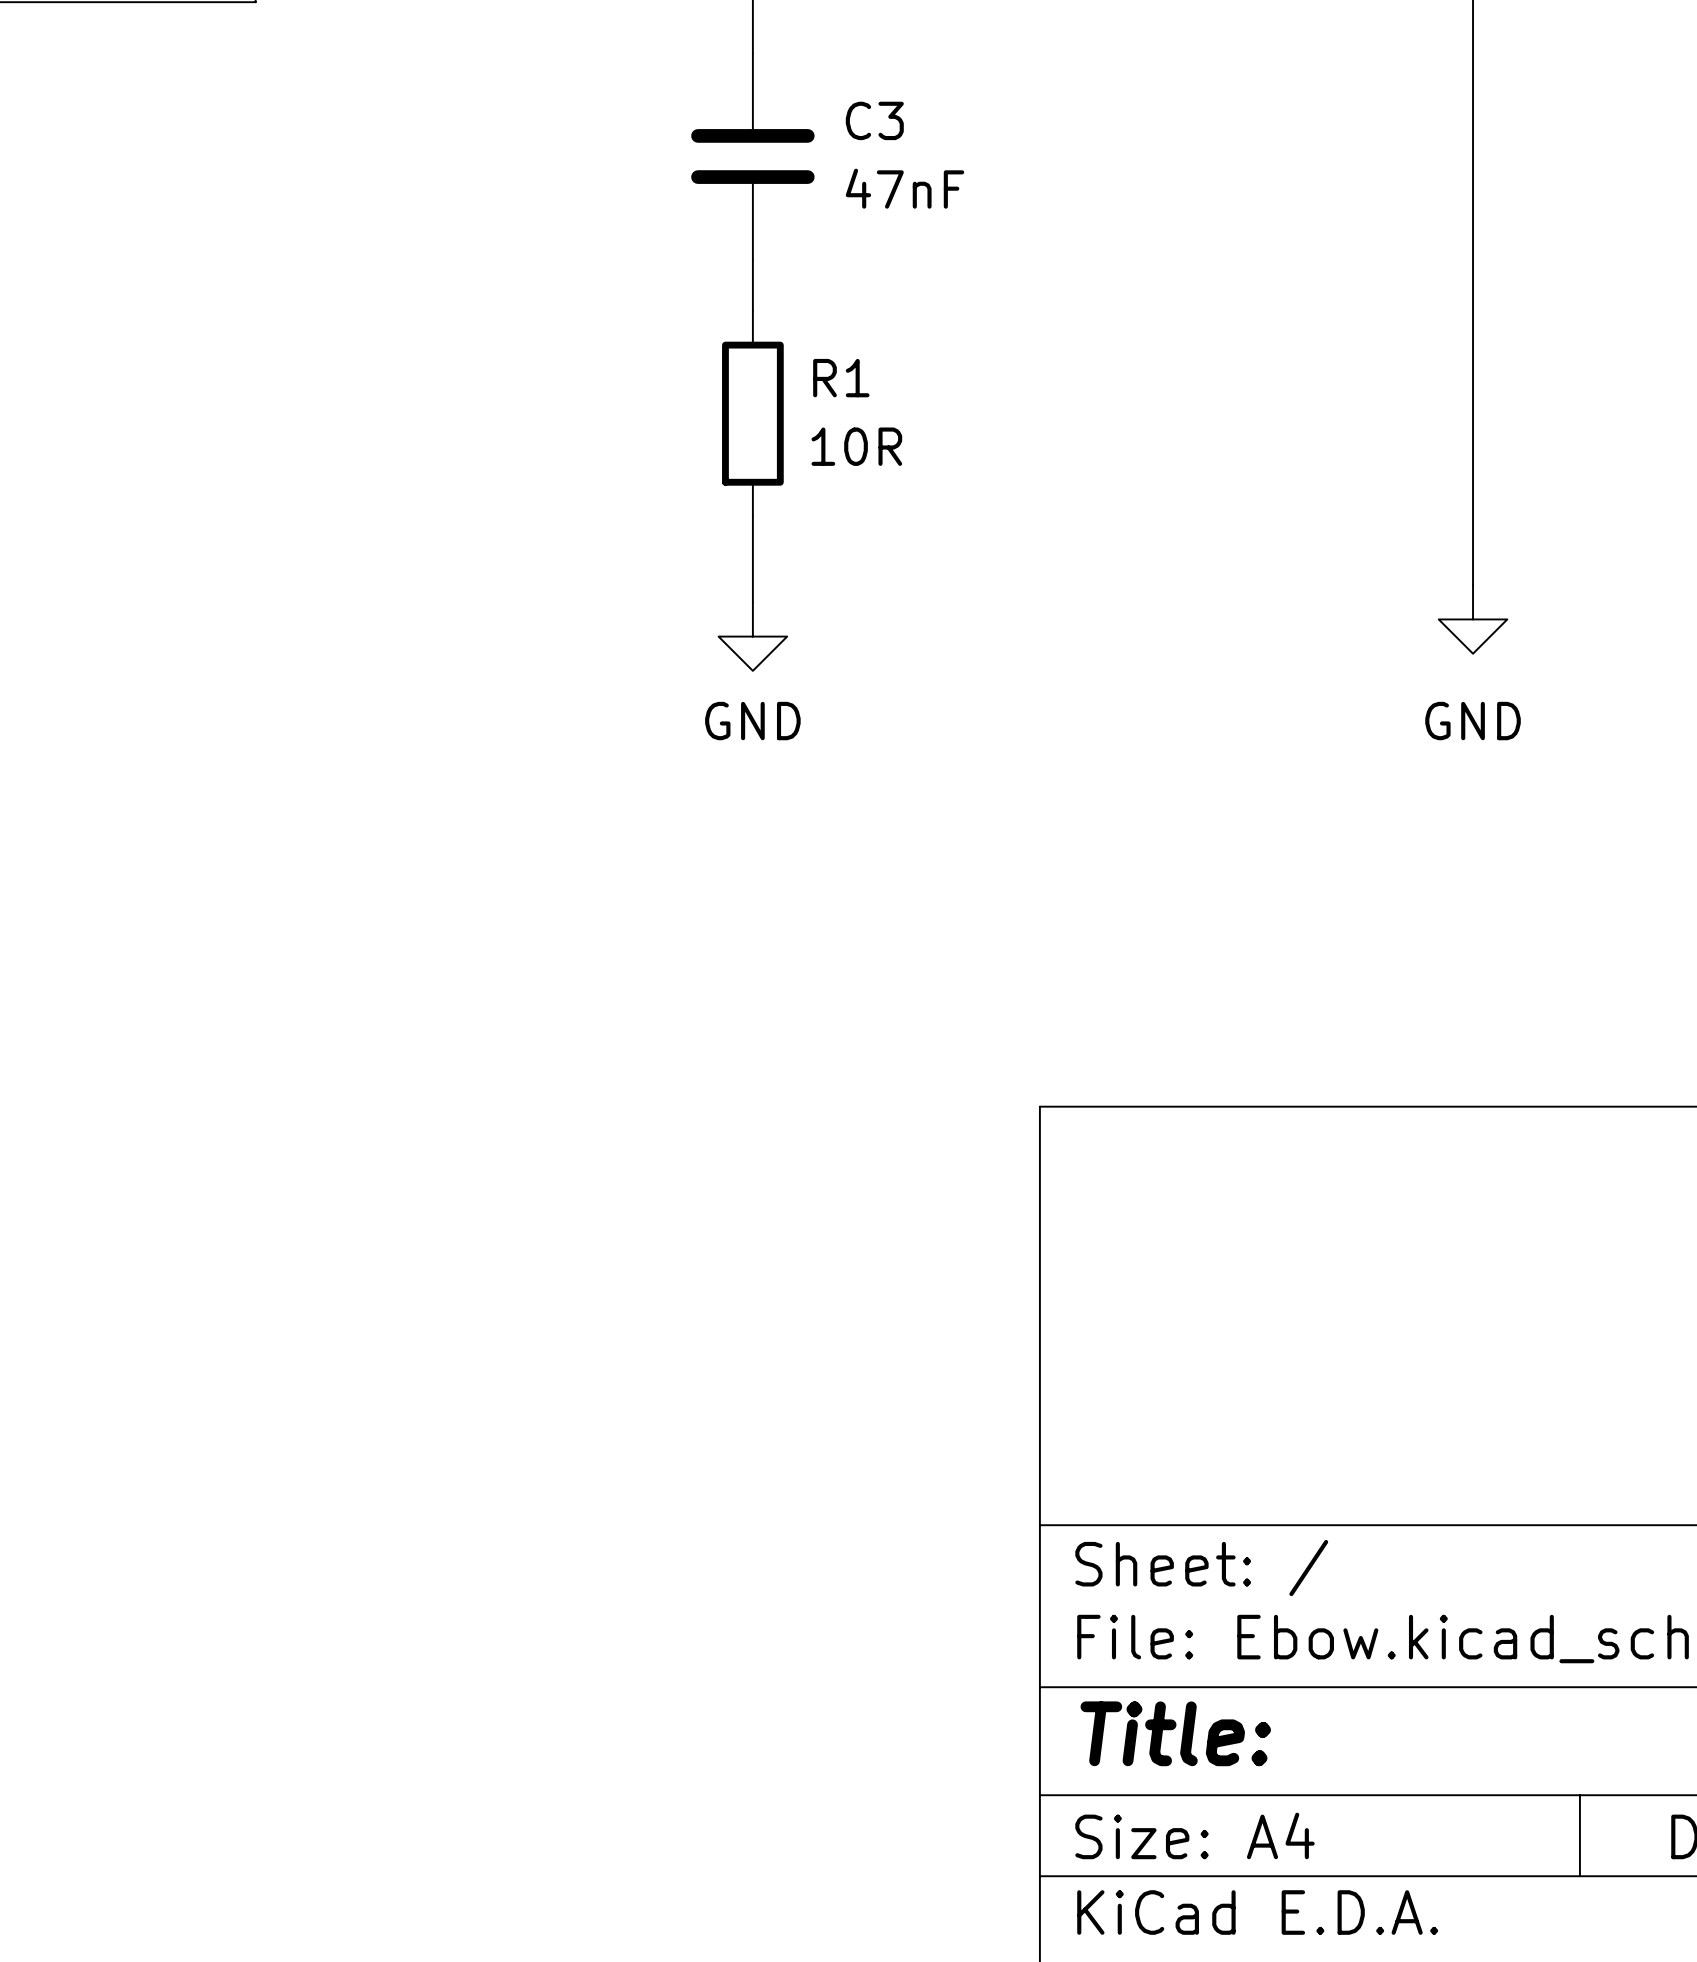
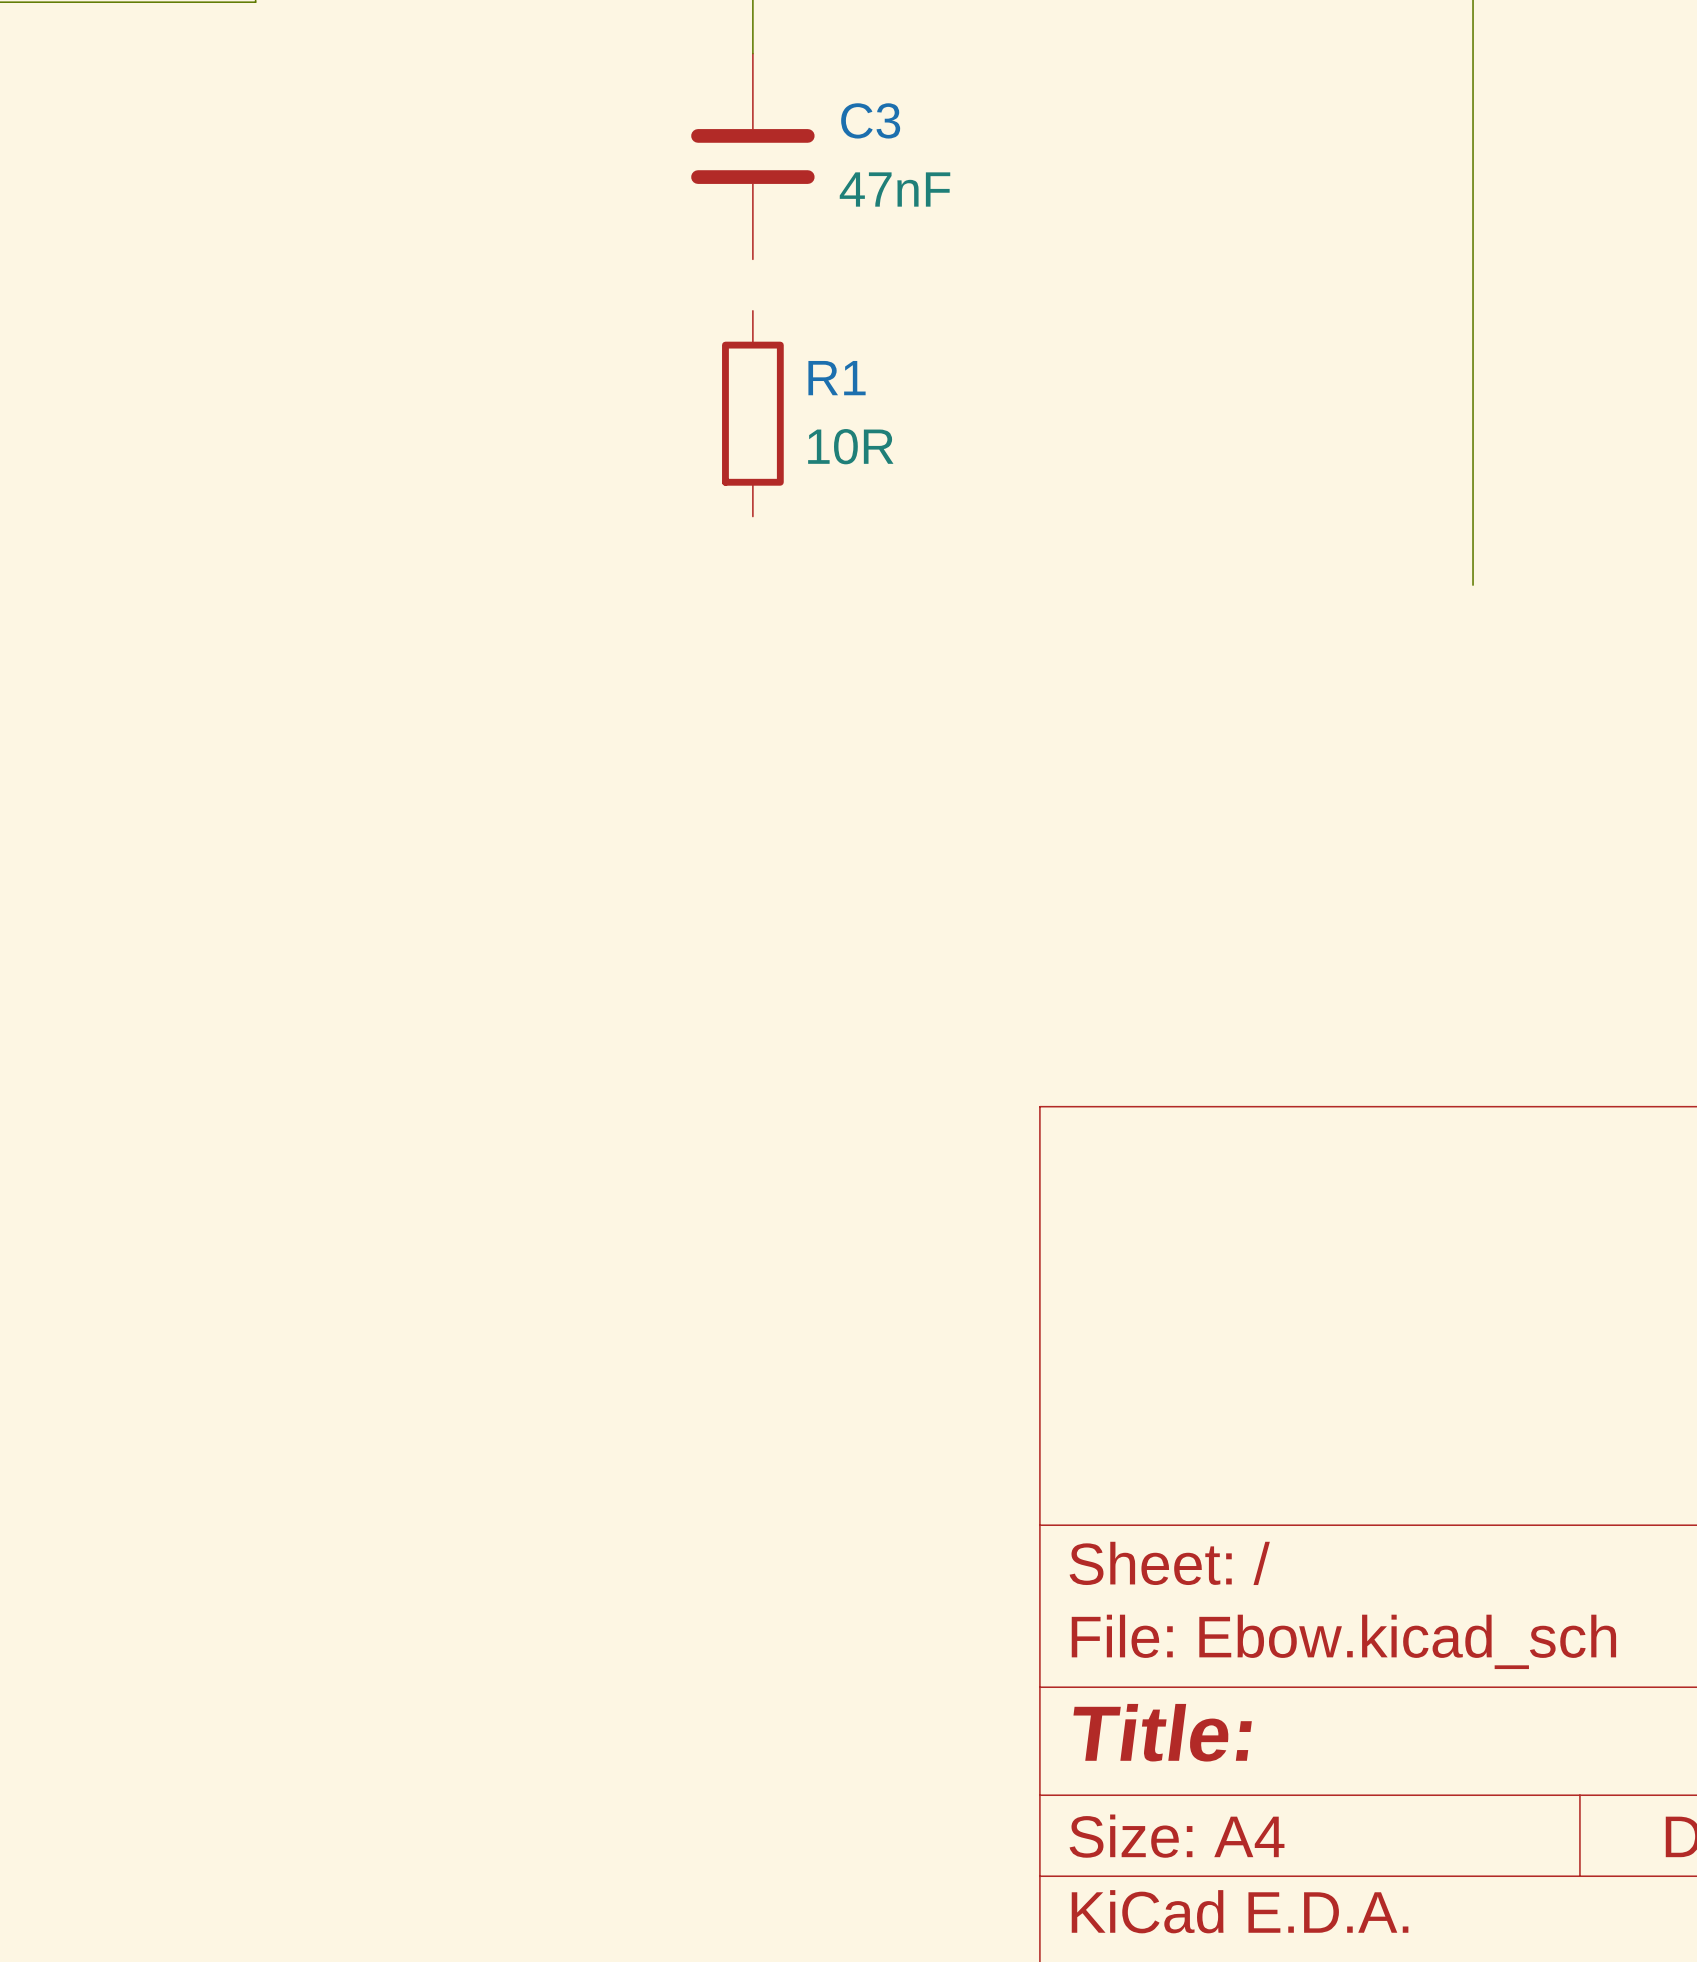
wire: (752, 259) (752, 310) -> none
wire: (752, 516) (752, 602) -> none
power symbol: GND (1473, 619) -> none
power symbol: GND (752, 636) -> none

